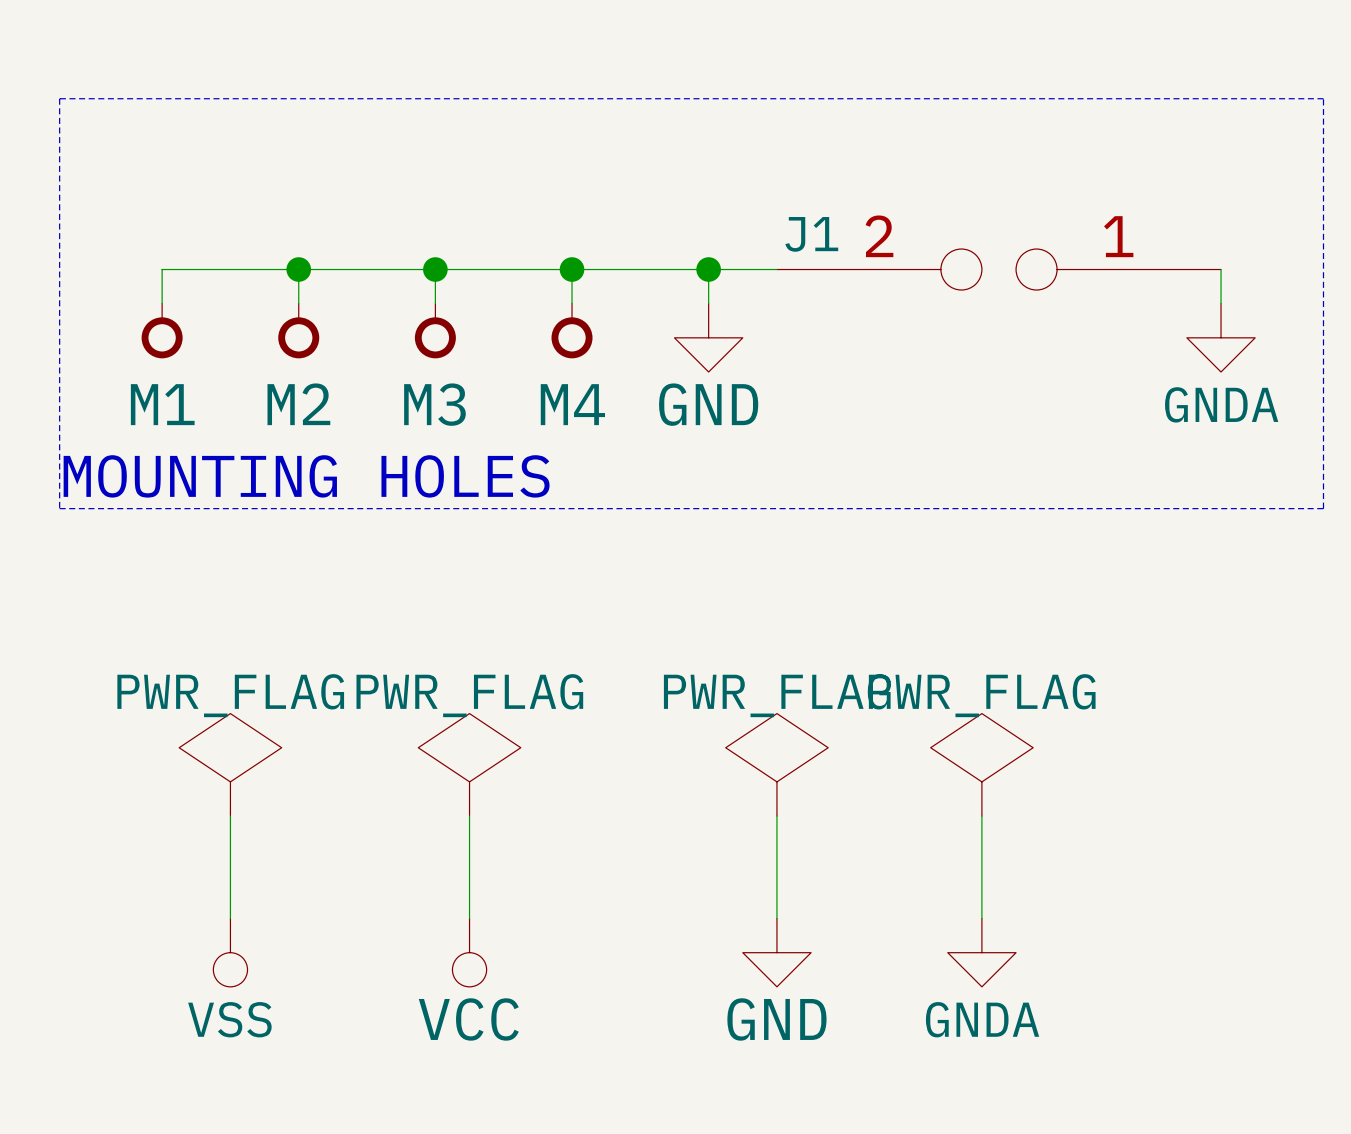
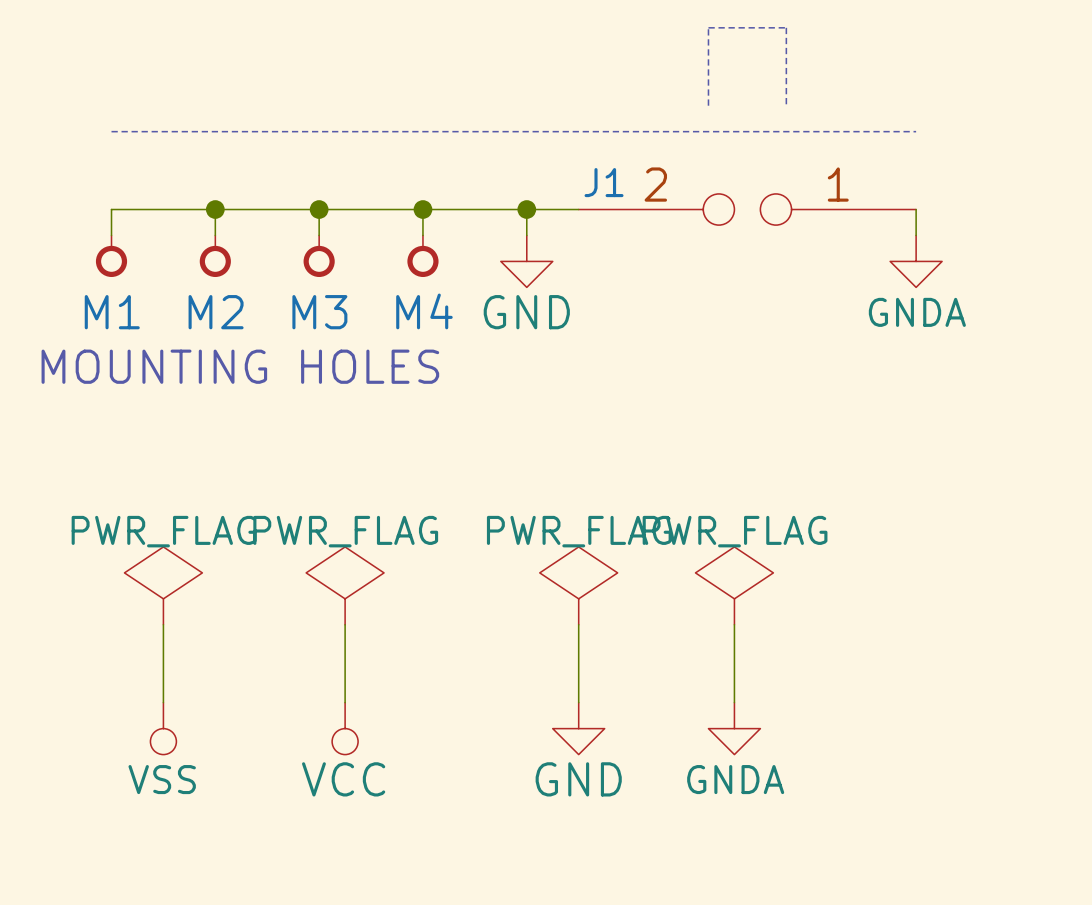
line: (59, 98) (1323, 98) (1323, 508) (59, 508) (59, 98) -> none
line: none -> (708, 105) (708, 27) (786, 27) (786, 105)
line: none -> (111, 131) (916, 131)

